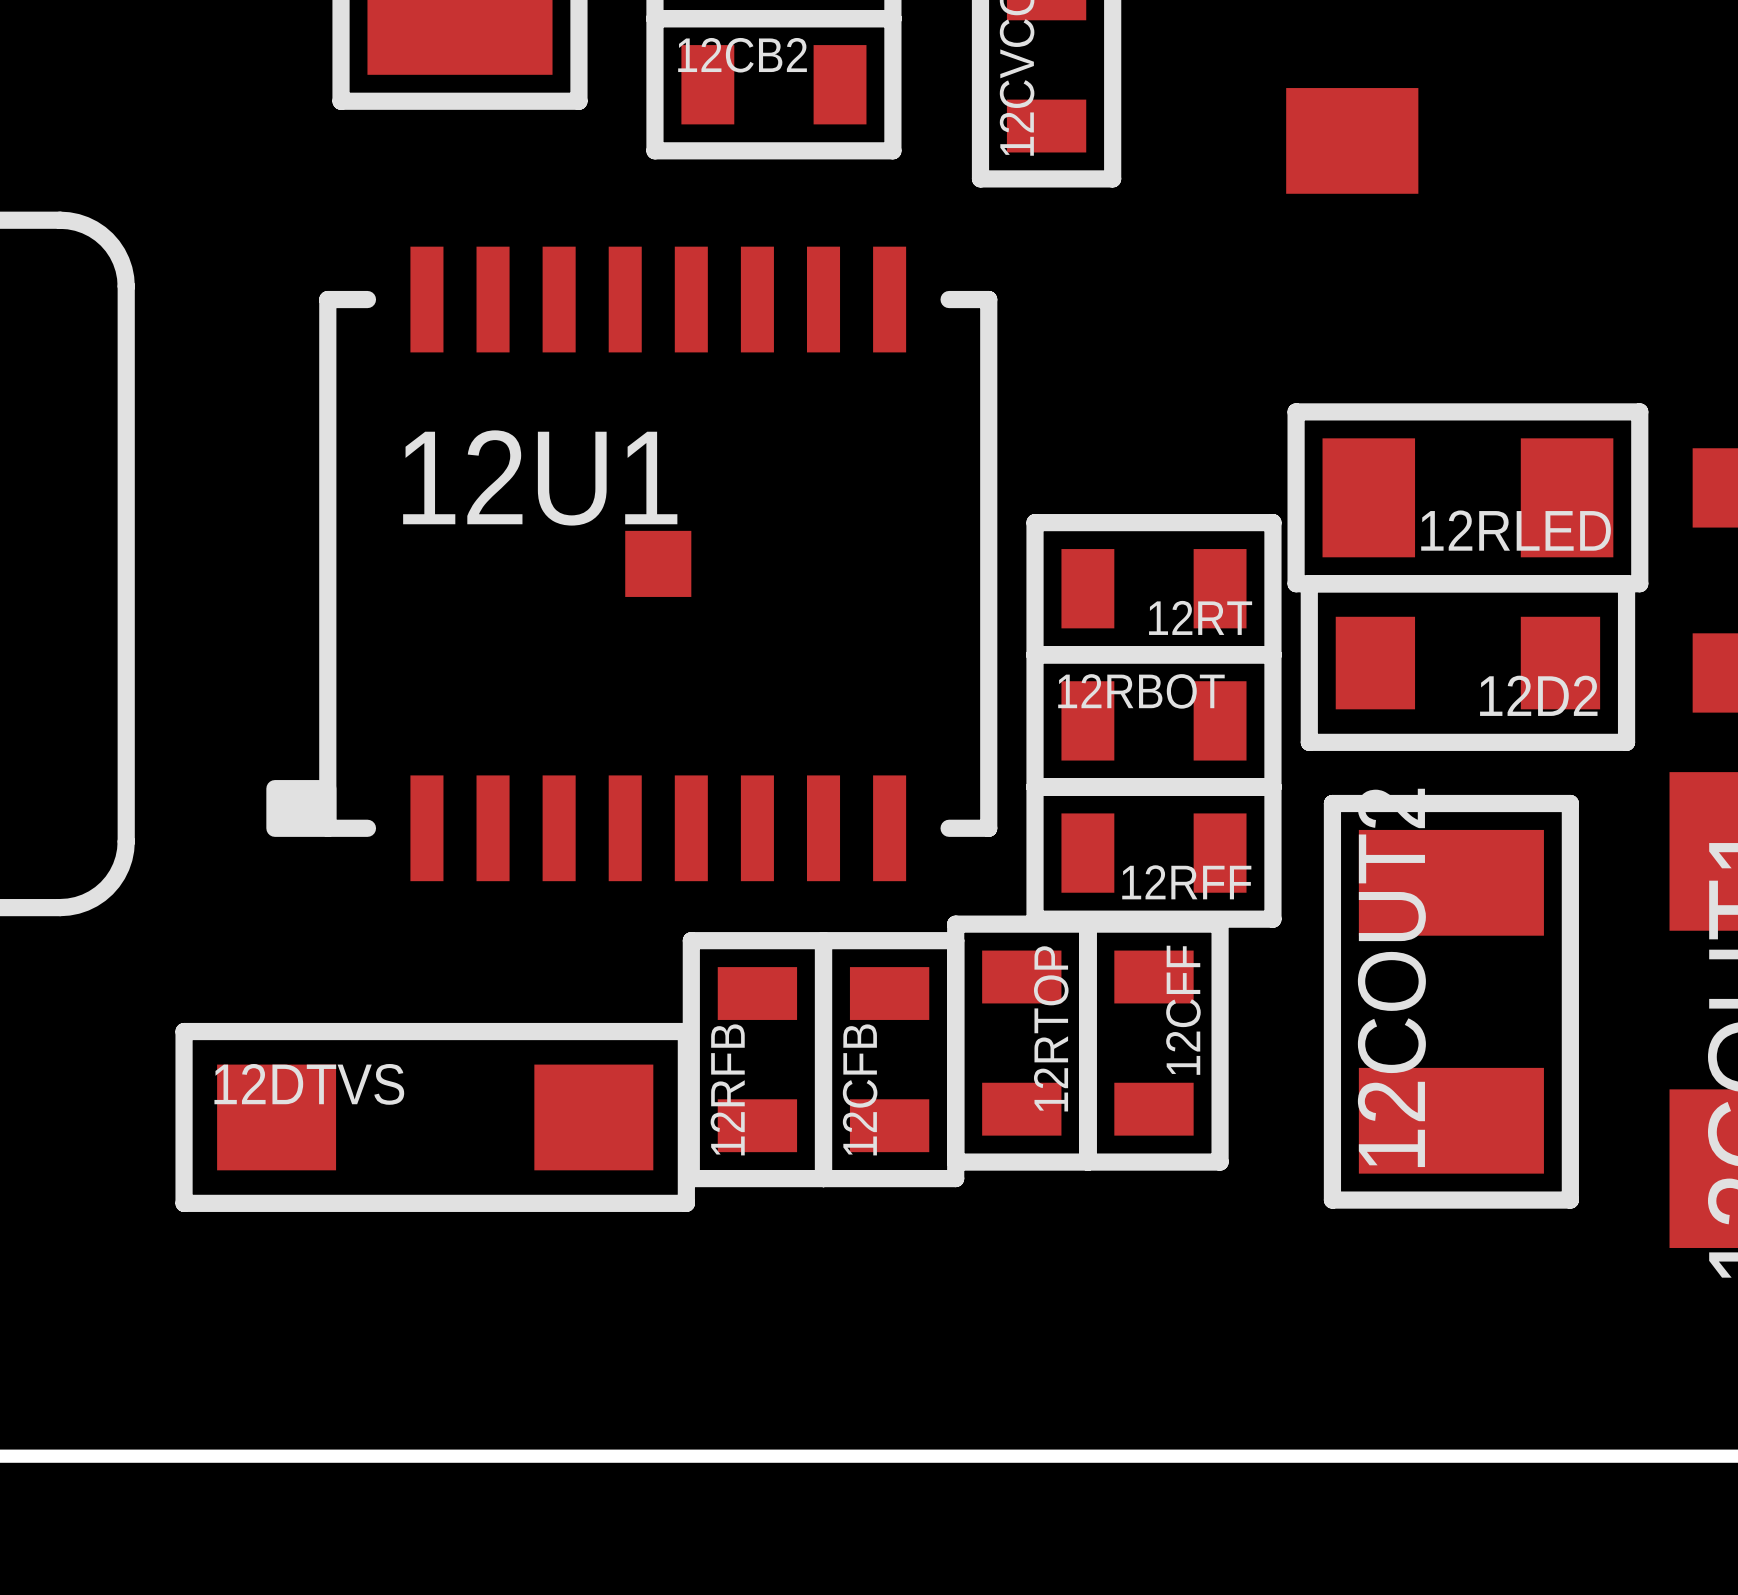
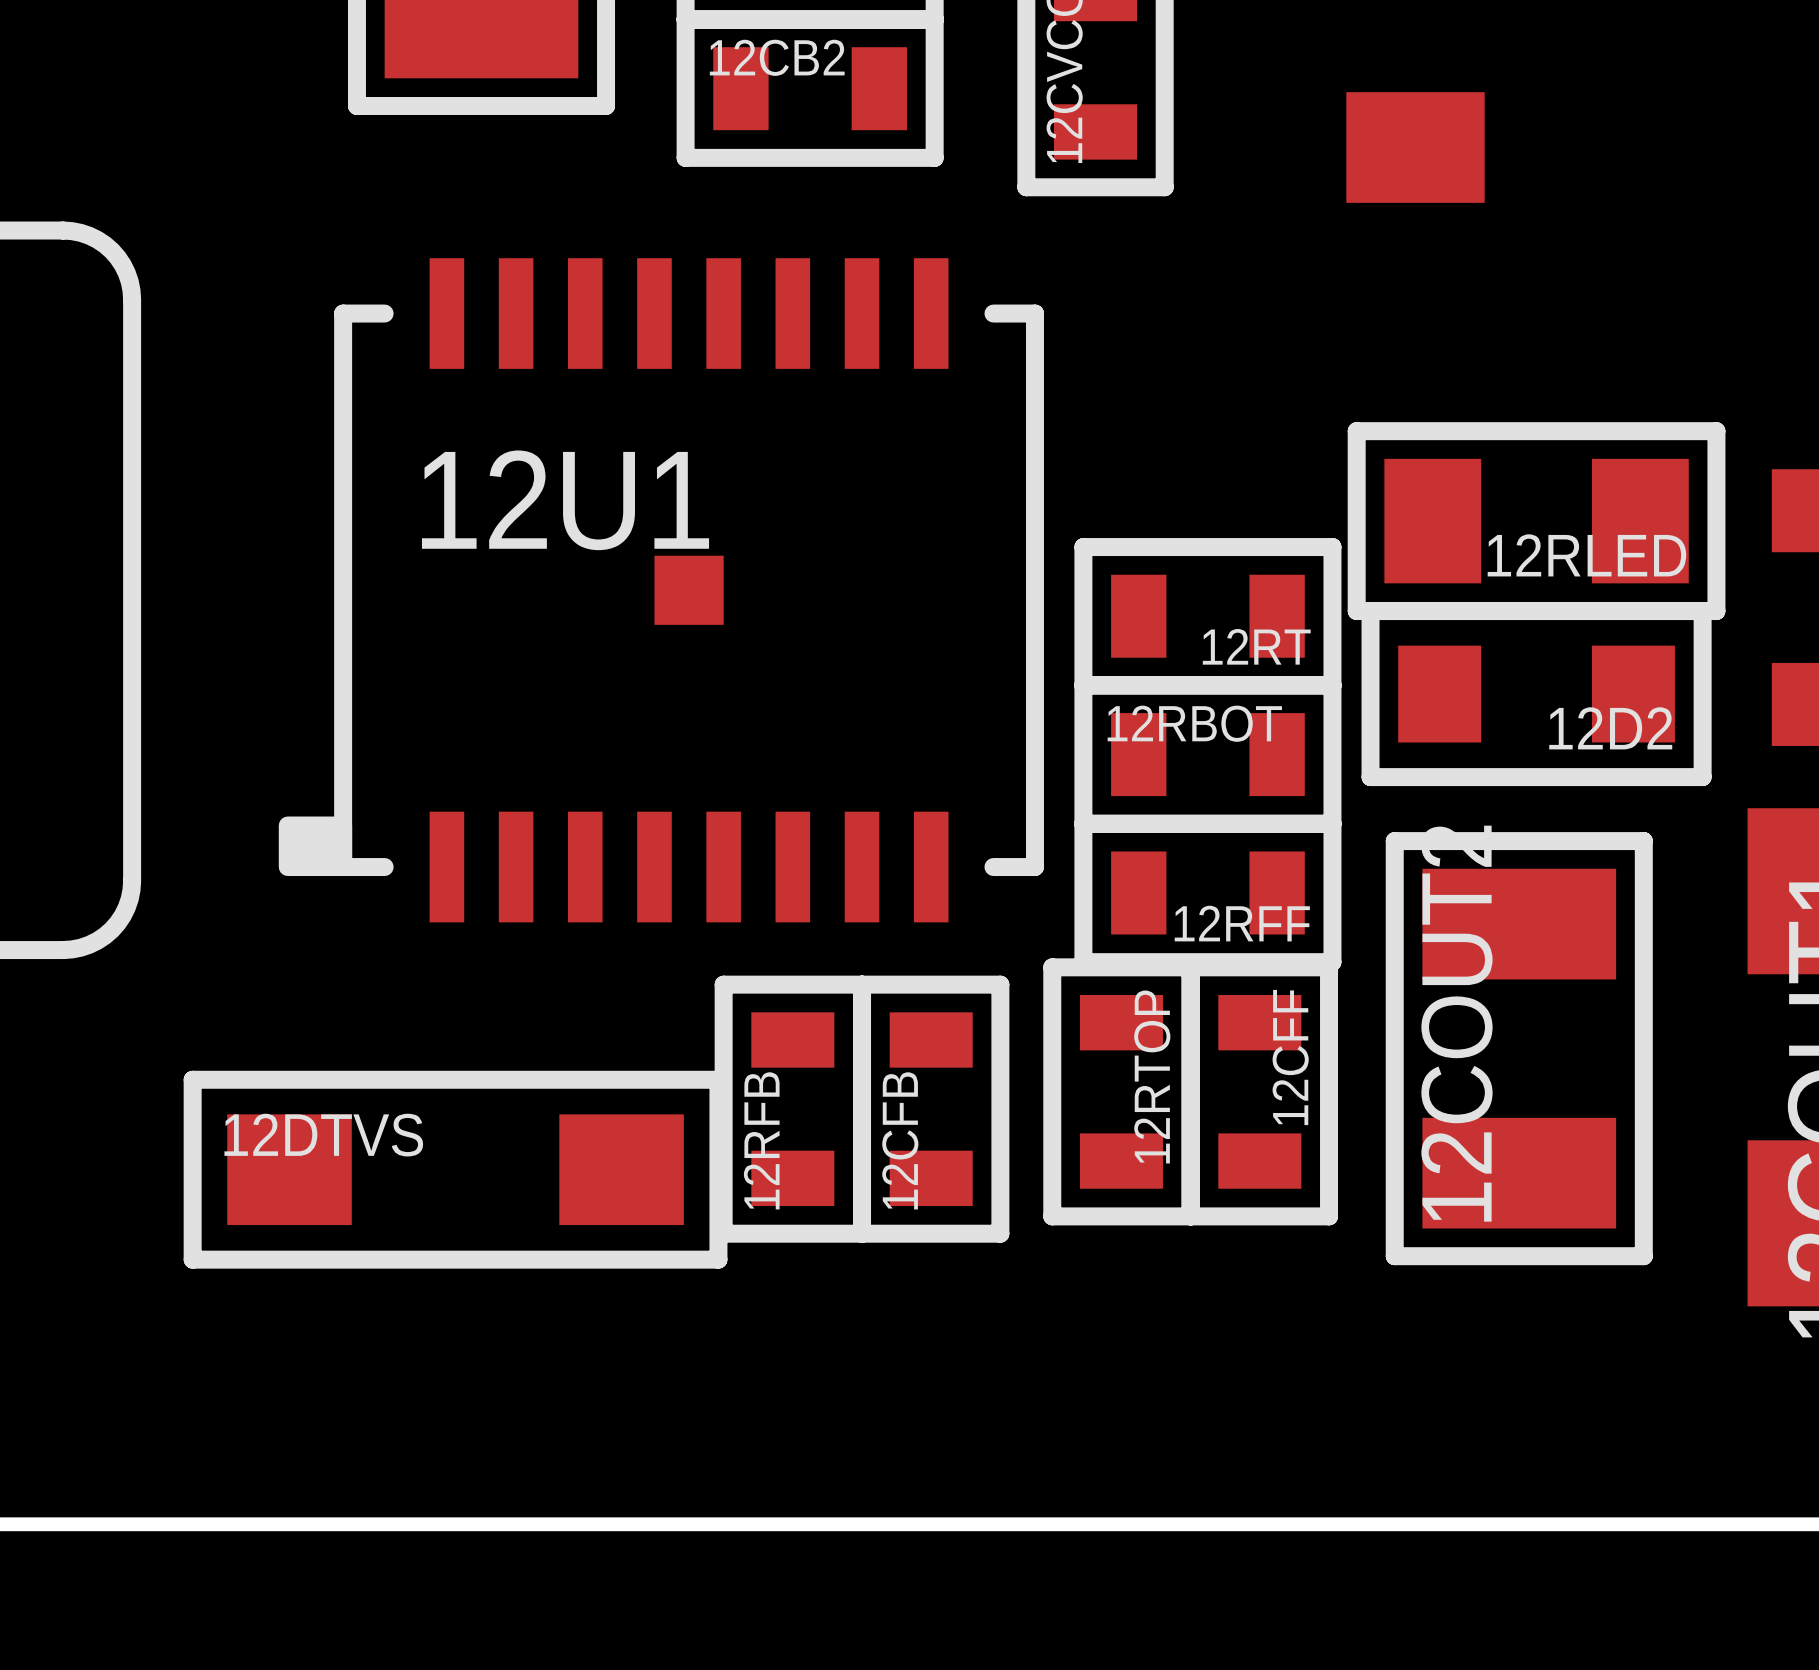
12RTOP position: (1021, 1043) -> (1121, 1091)
12CFF position: (1153, 1043) -> (1259, 1091)

